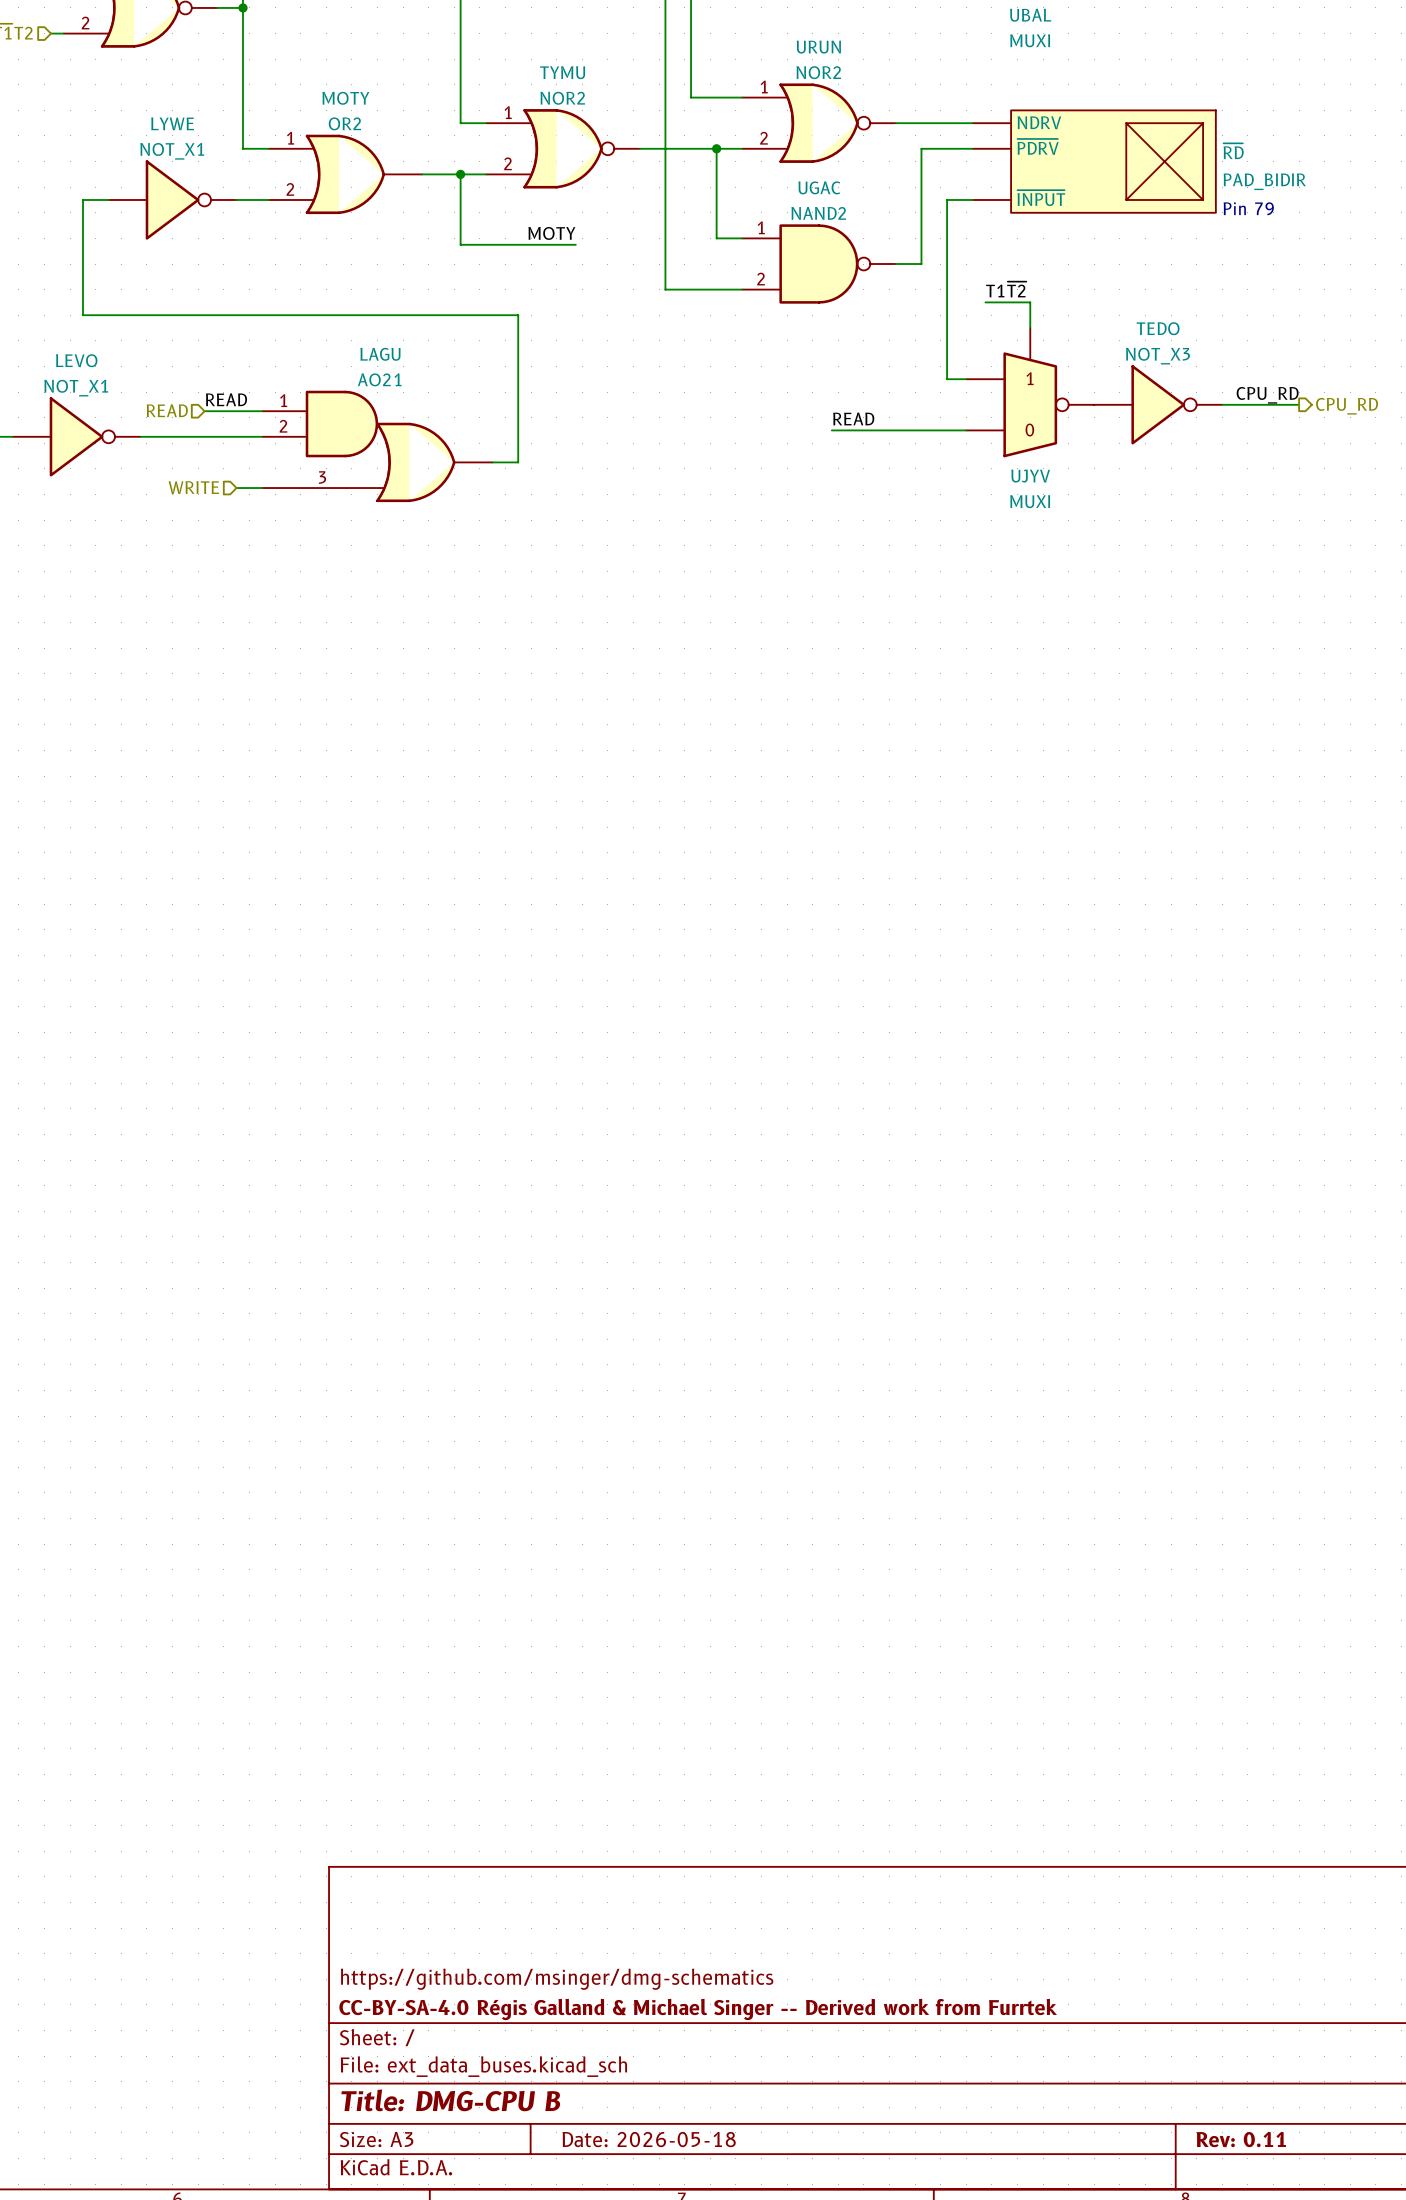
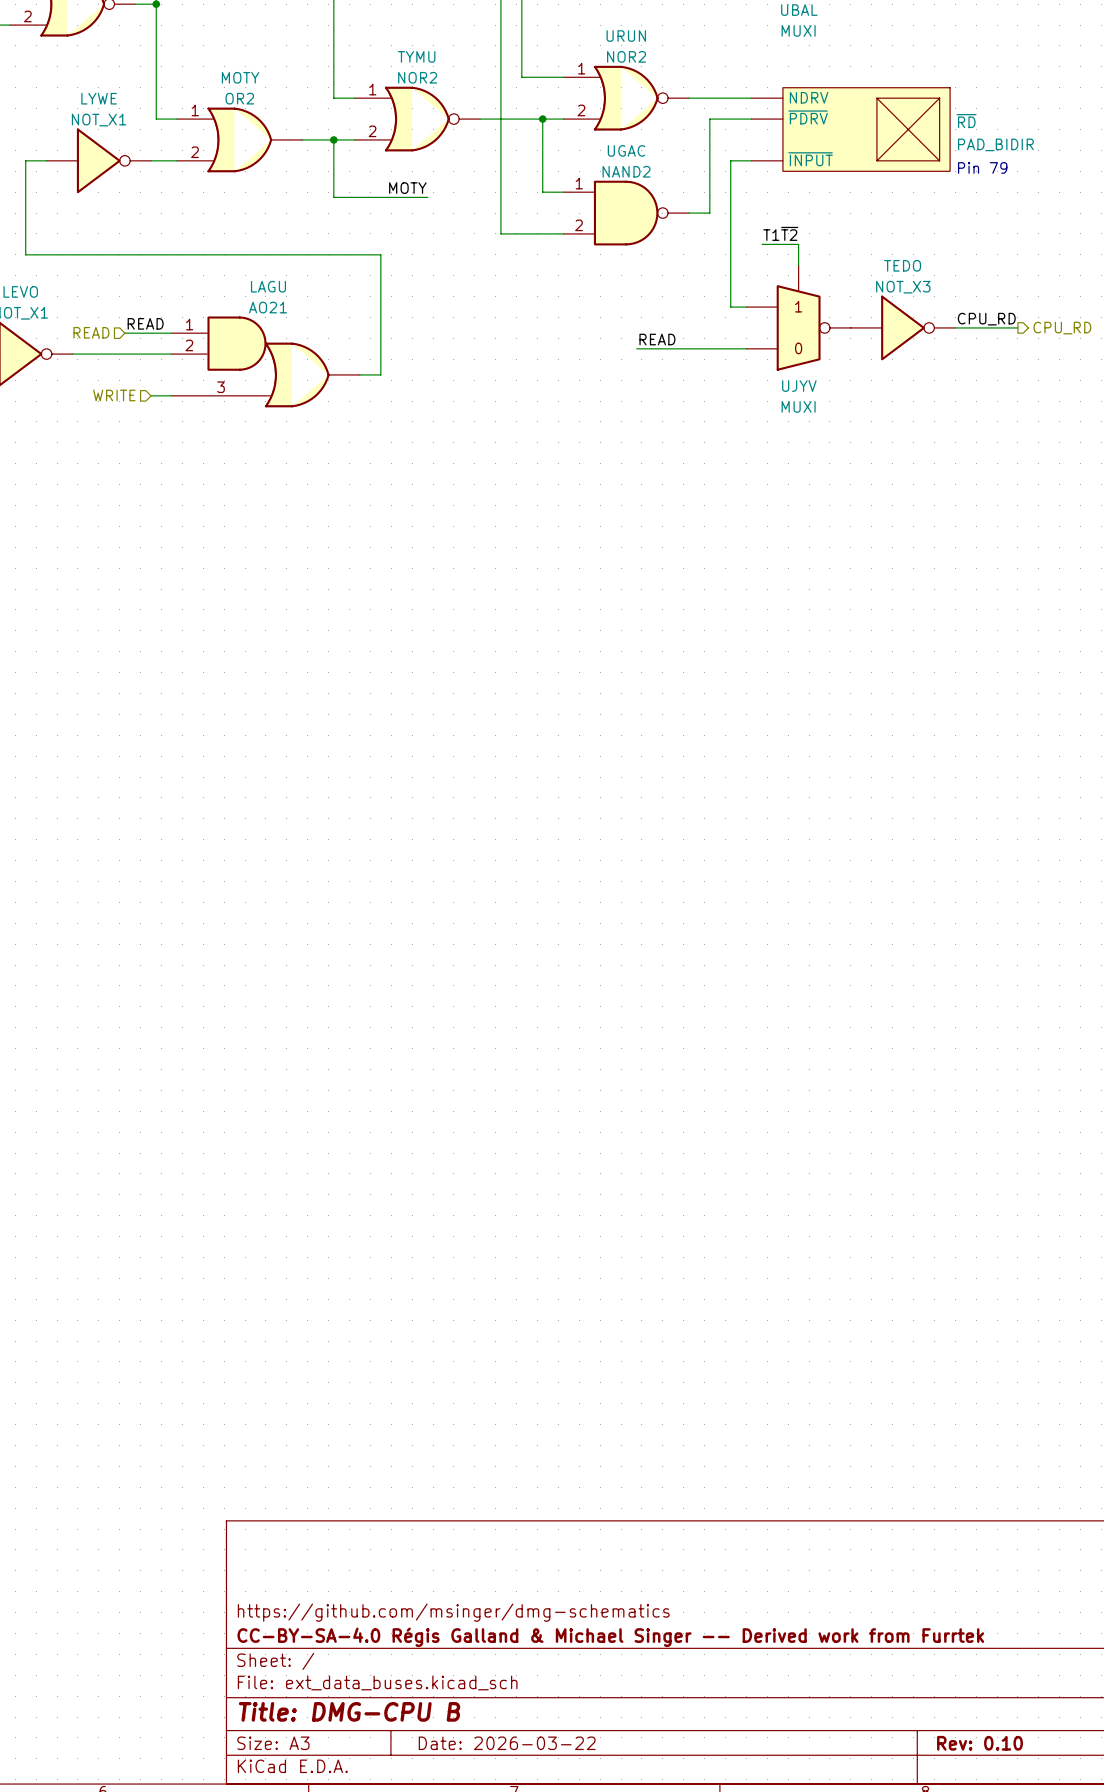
title block: Date: 2026-05-18 (649, 2139) -> Date: 2026-03-22 (507, 1743)
title block: Rev: 0.11 (1241, 2139) -> Rev: 0.10 (980, 1743)

